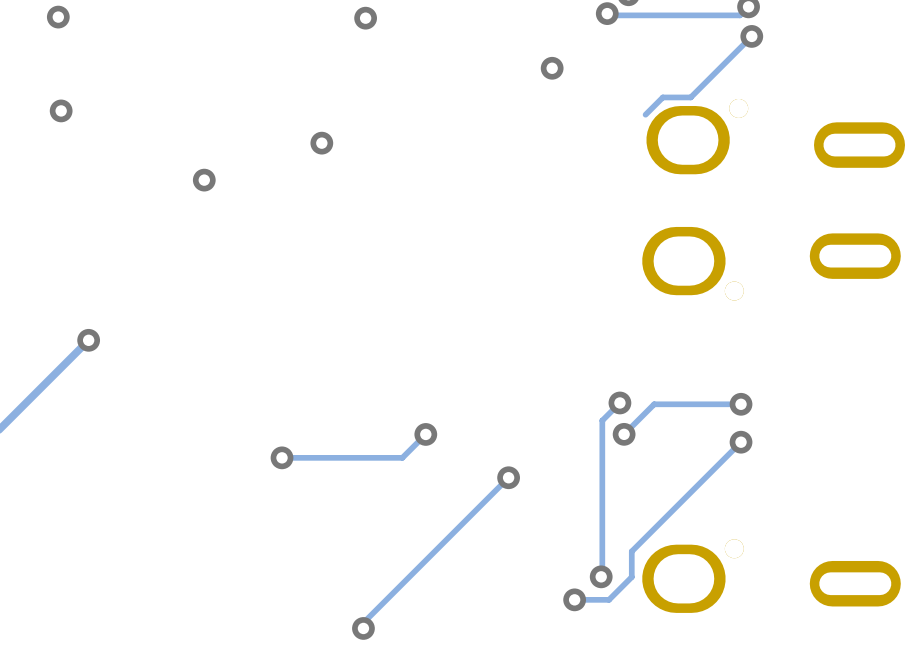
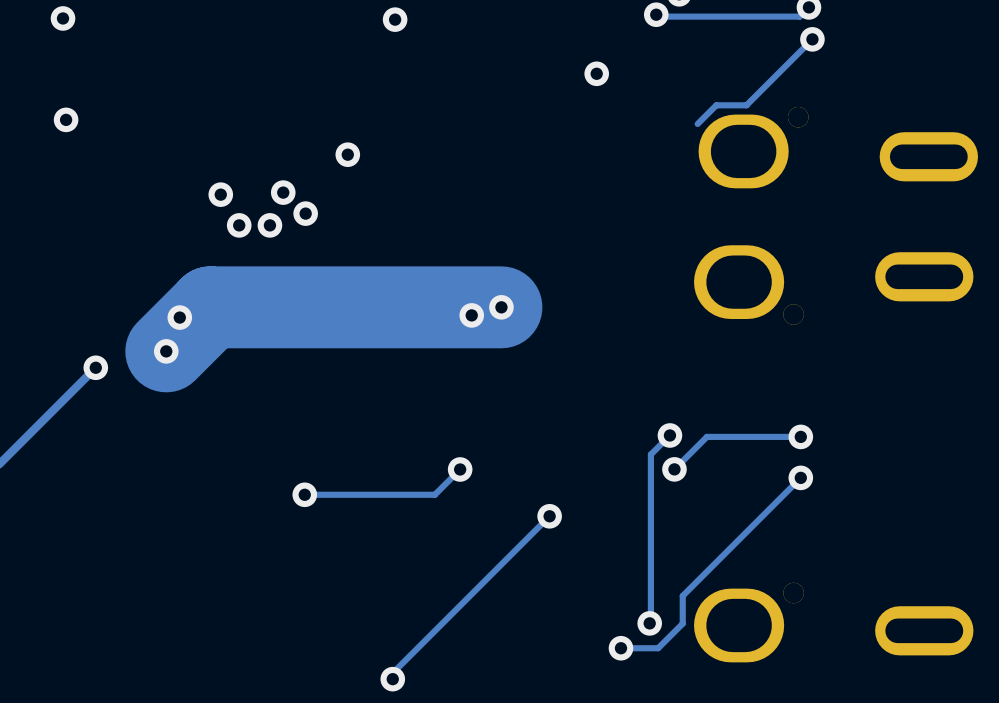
via: none -> (283, 192)
via: none -> (305, 213)
via: none -> (239, 225)
via: none -> (269, 225)
track: none -> (501, 307) (210, 307) (166, 351)
via: none -> (501, 307)
via: none -> (471, 315)
via: none -> (179, 317)
via: none -> (166, 351)

